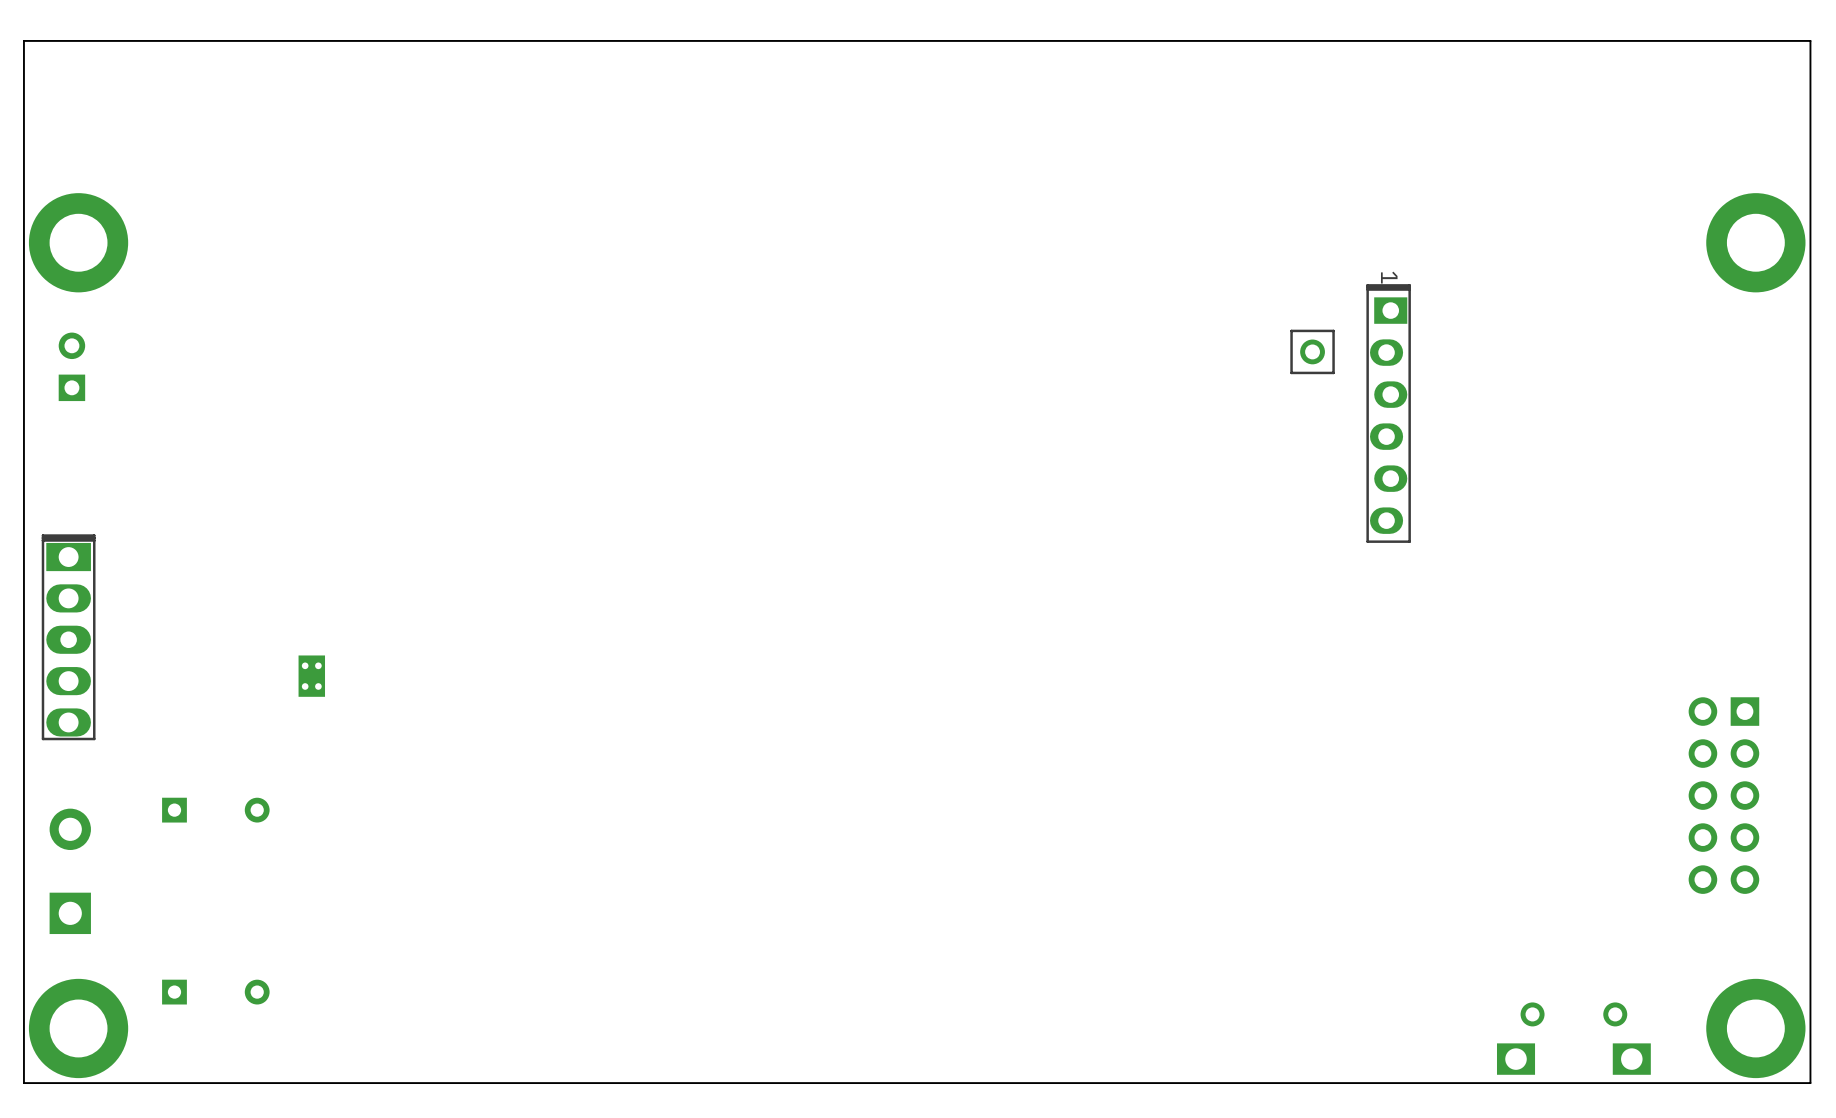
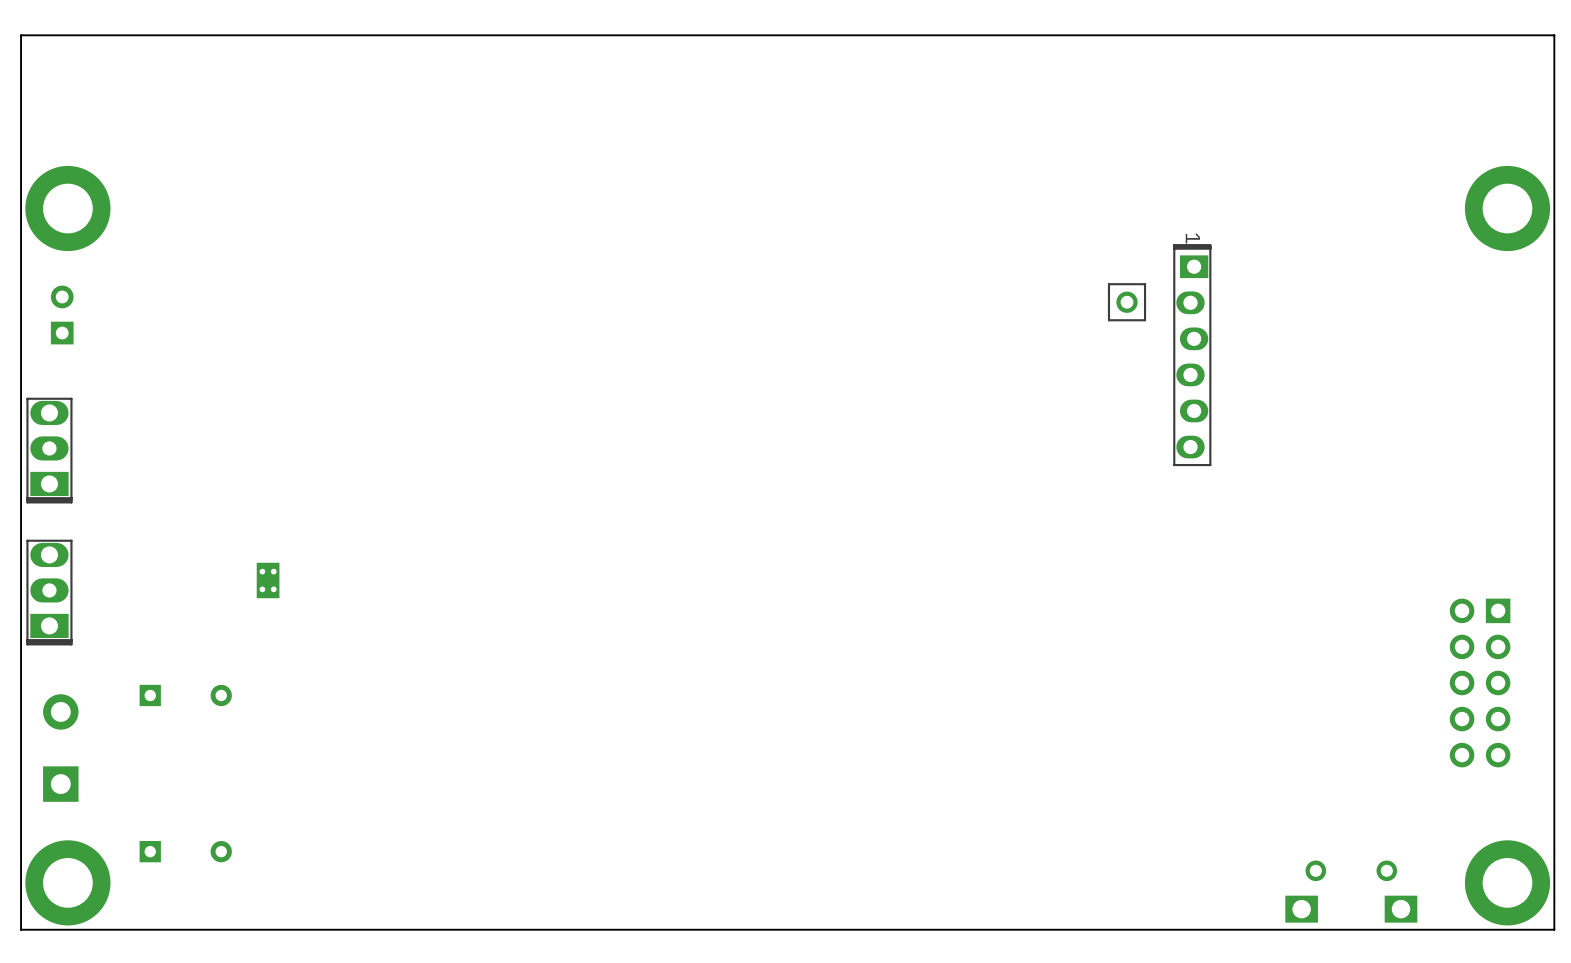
part: none -> (49, 450)
part: (68, 637) -> none
part: none -> (49, 592)

